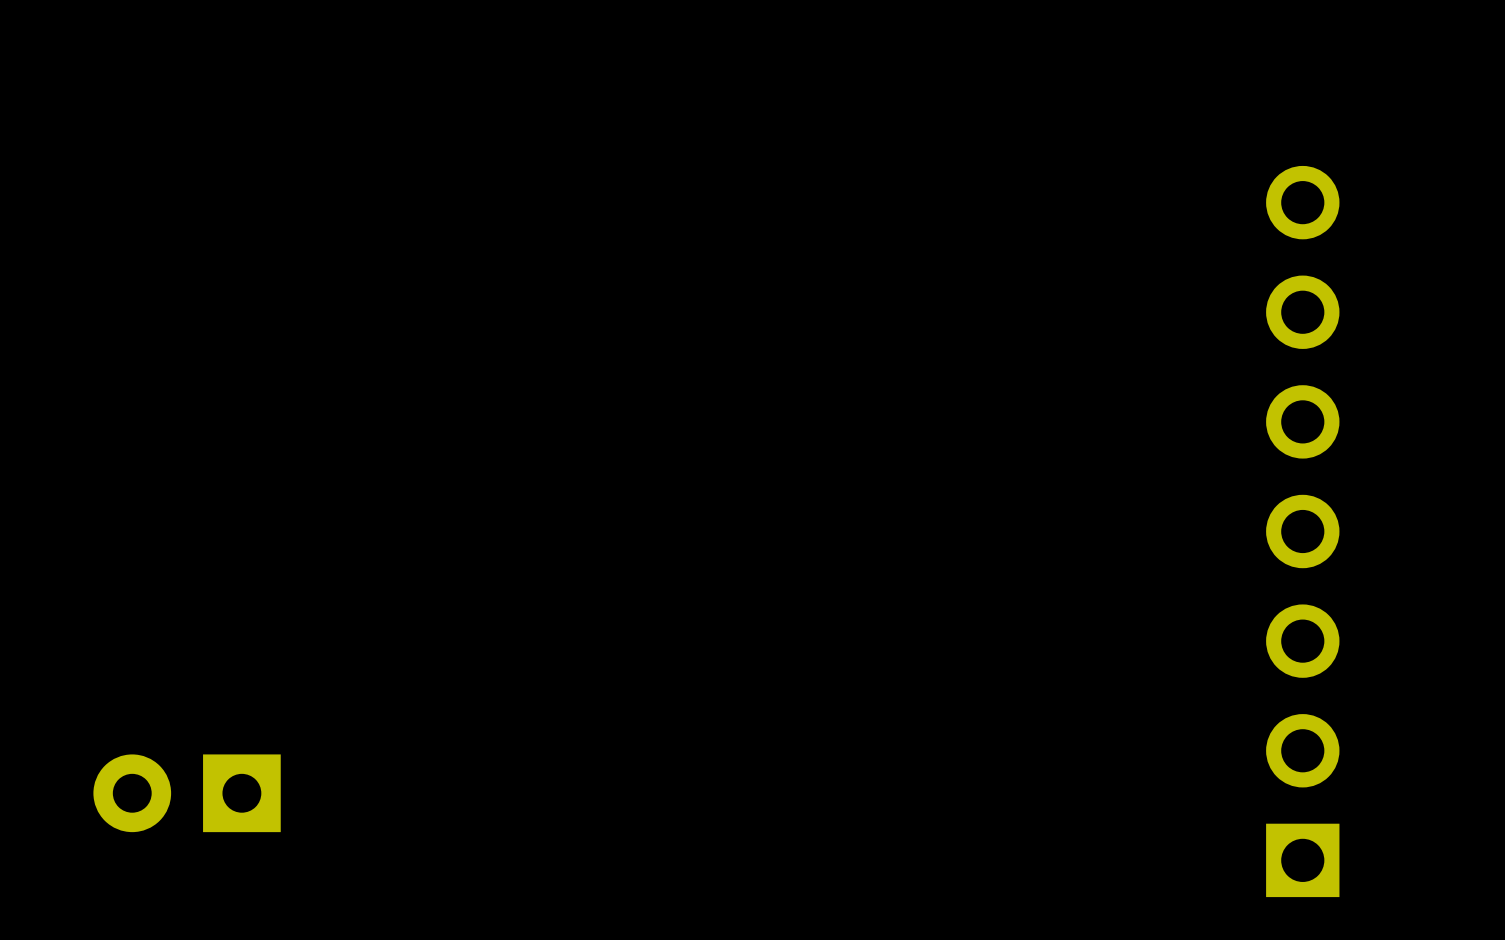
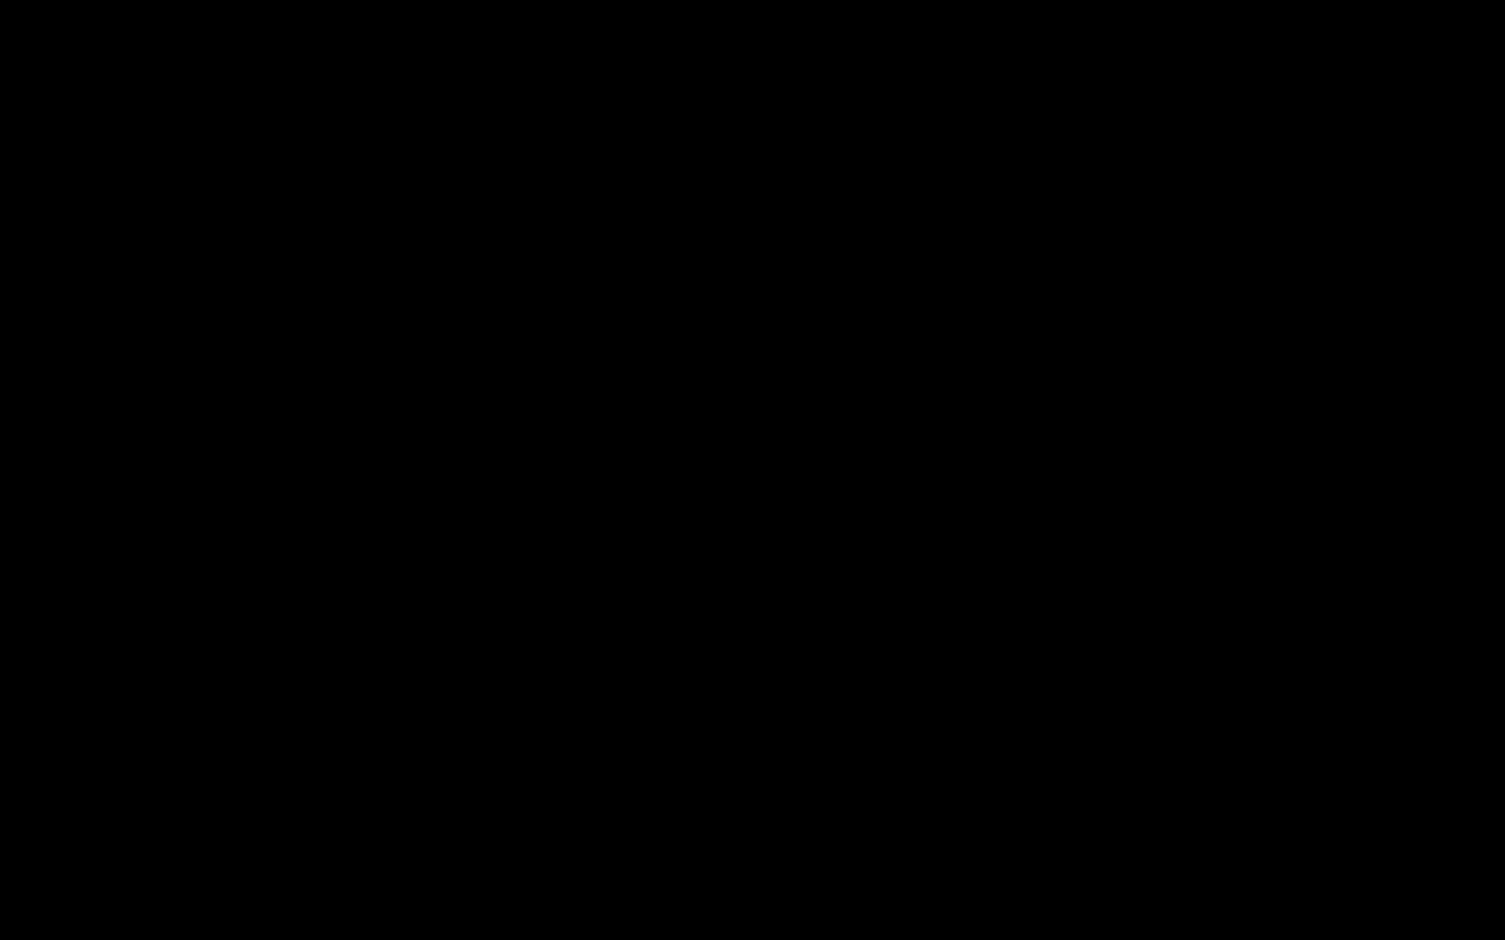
part: (1302, 531) -> none
part: (187, 793) -> none

